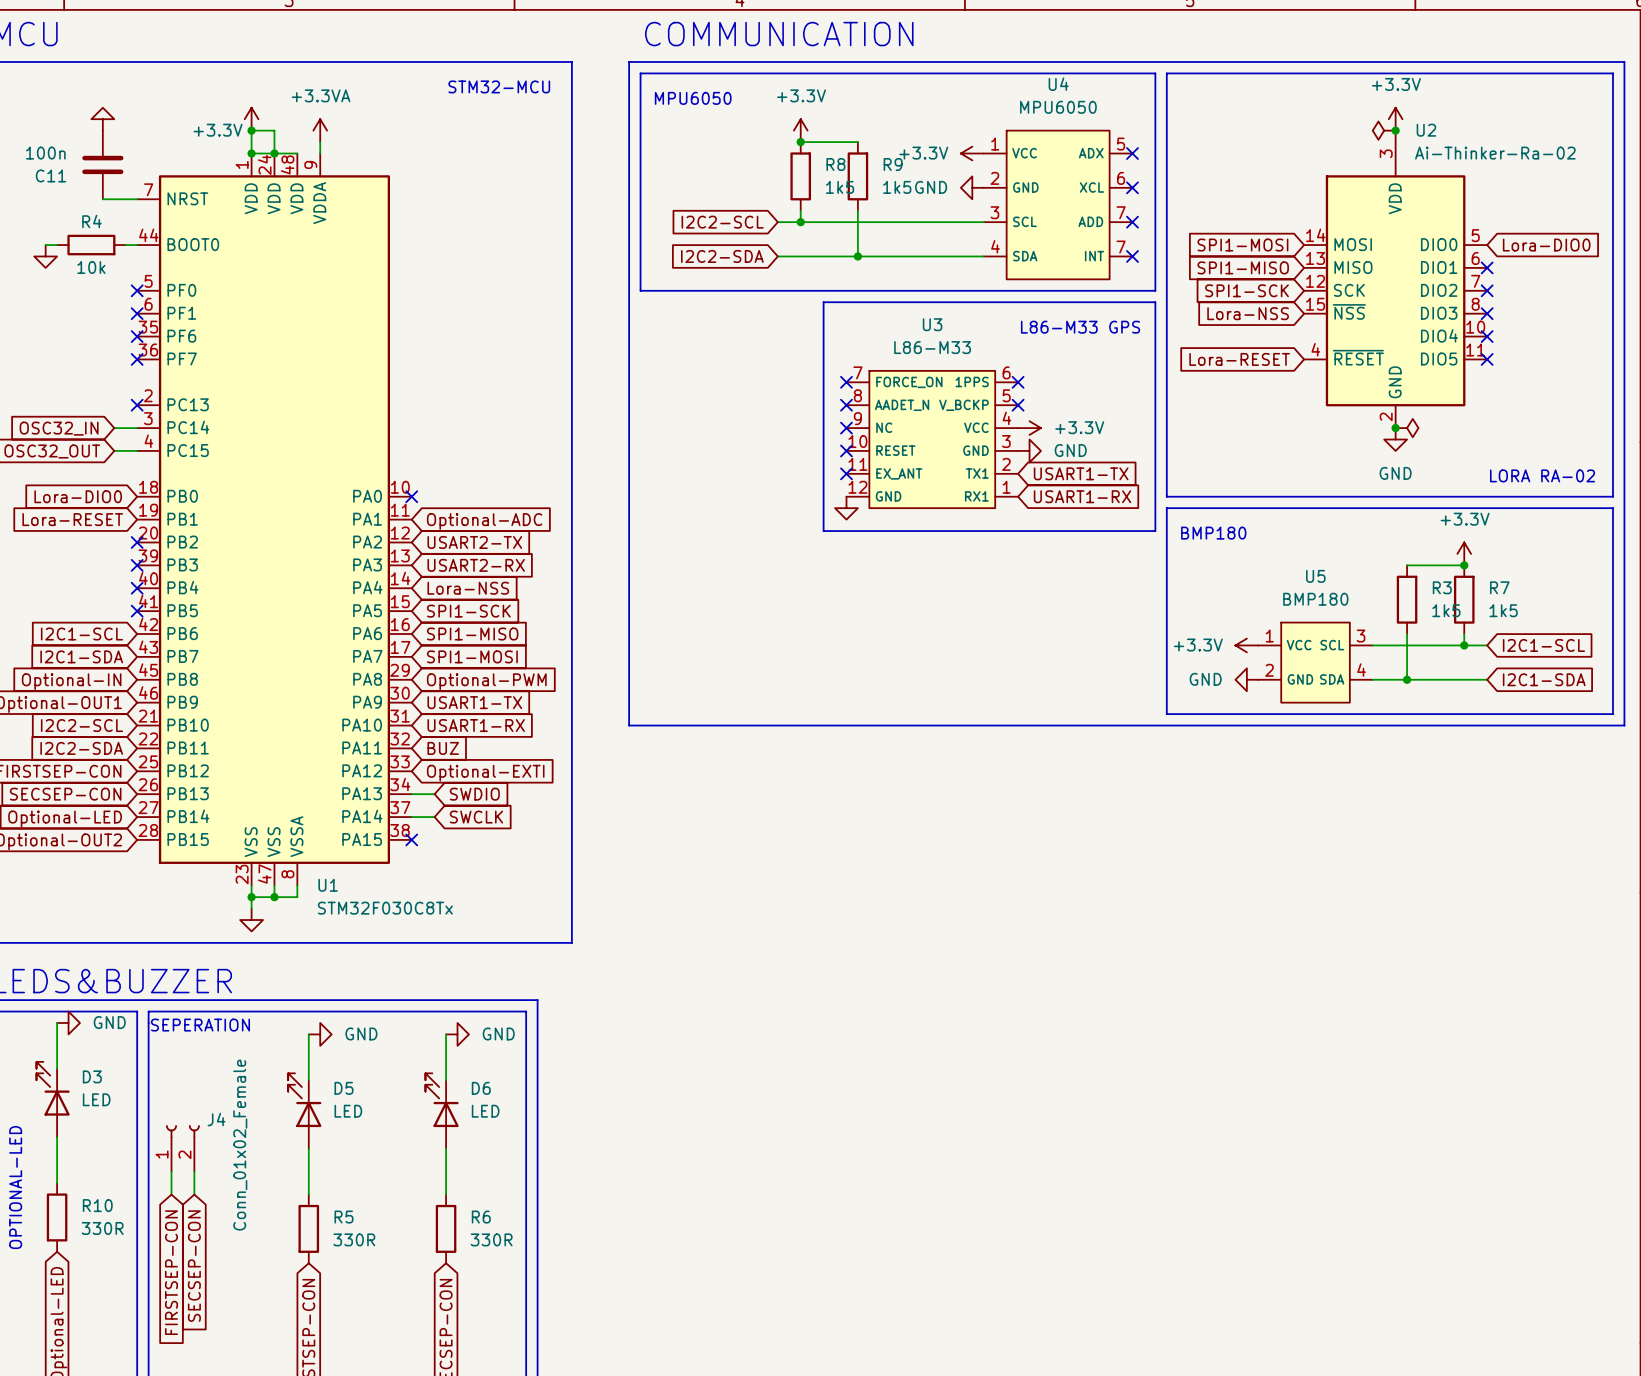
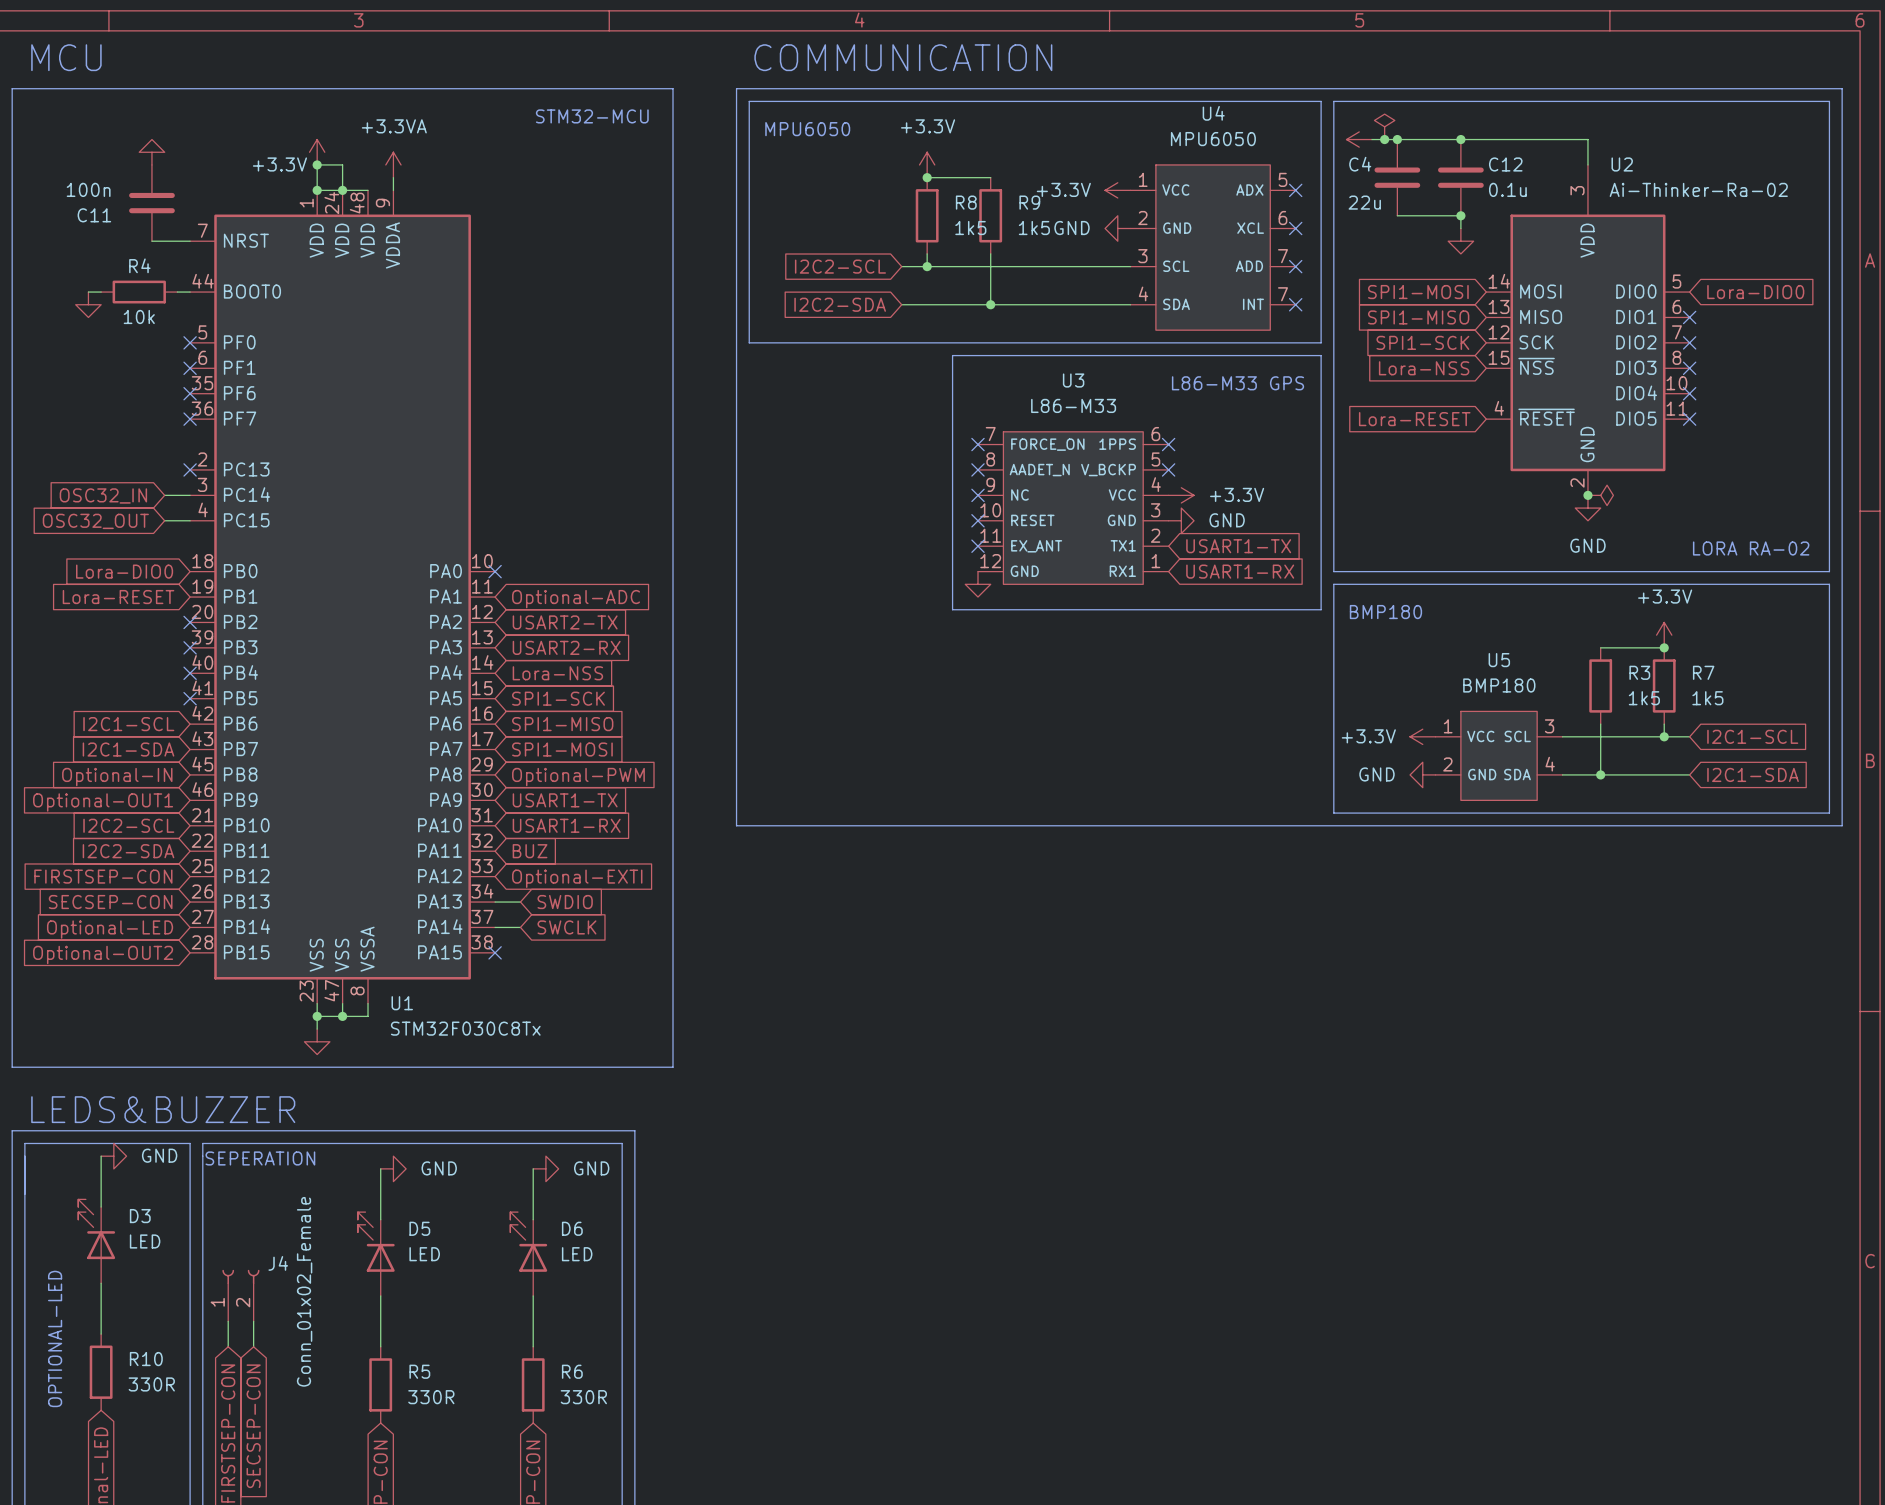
power symbol: none -> (1359, 139)
wire: none -> (1371, 139) (1587, 139) (1587, 164)
junction: none -> (1384, 139)
junction: none -> (1397, 139)
junction: none -> (1460, 139)
power symbol: +3.3V (1395, 119) -> none
power symbol rotation: 0° (1384, 130) -> 90° clockwise (1384, 126)
power symbol position: (1384, 130) -> (1384, 126)
junction: (1395, 130) -> none
C4: none -> 22u (1397, 177)
C12: none -> 0.1u (1460, 177)
wire: none -> (1397, 215) (1460, 215) (1460, 228)
junction: none -> (1460, 215)
power symbol: none -> (1460, 241)

